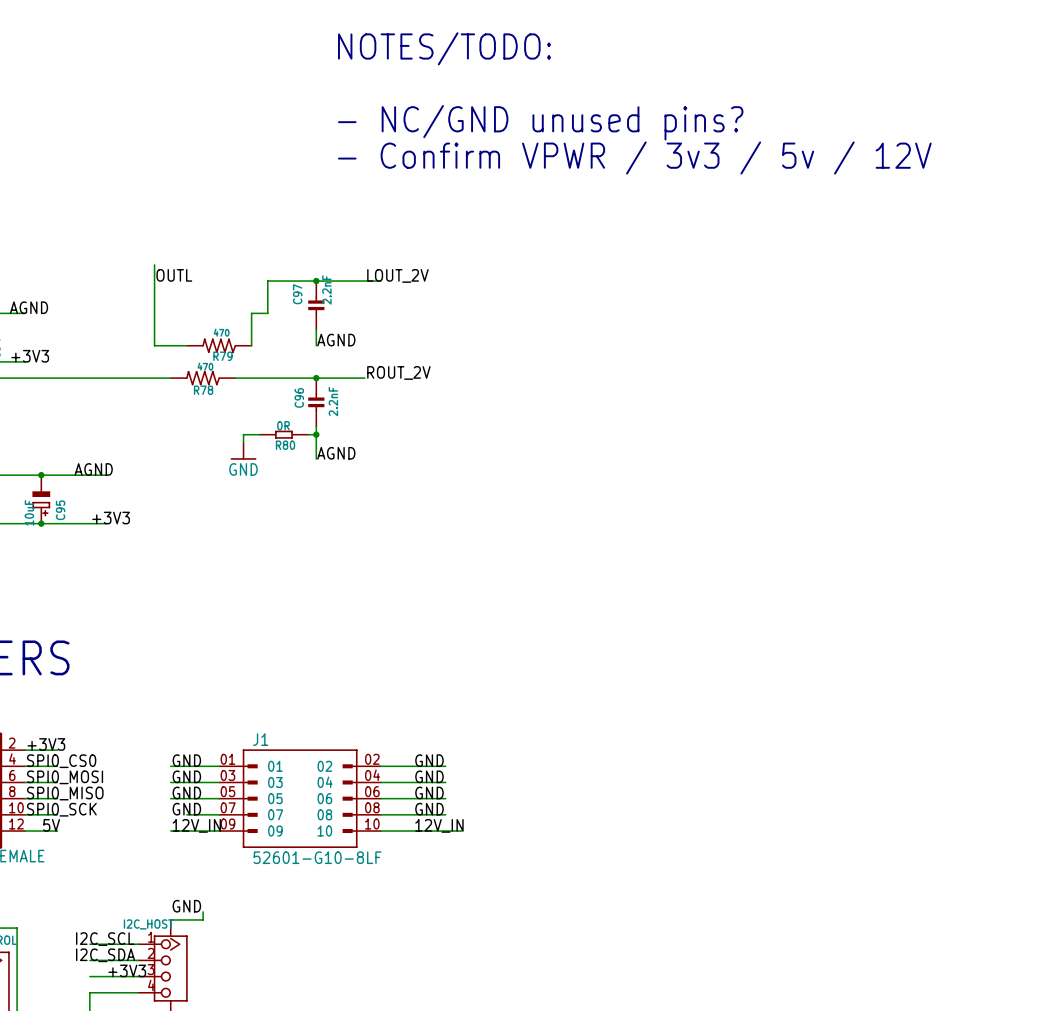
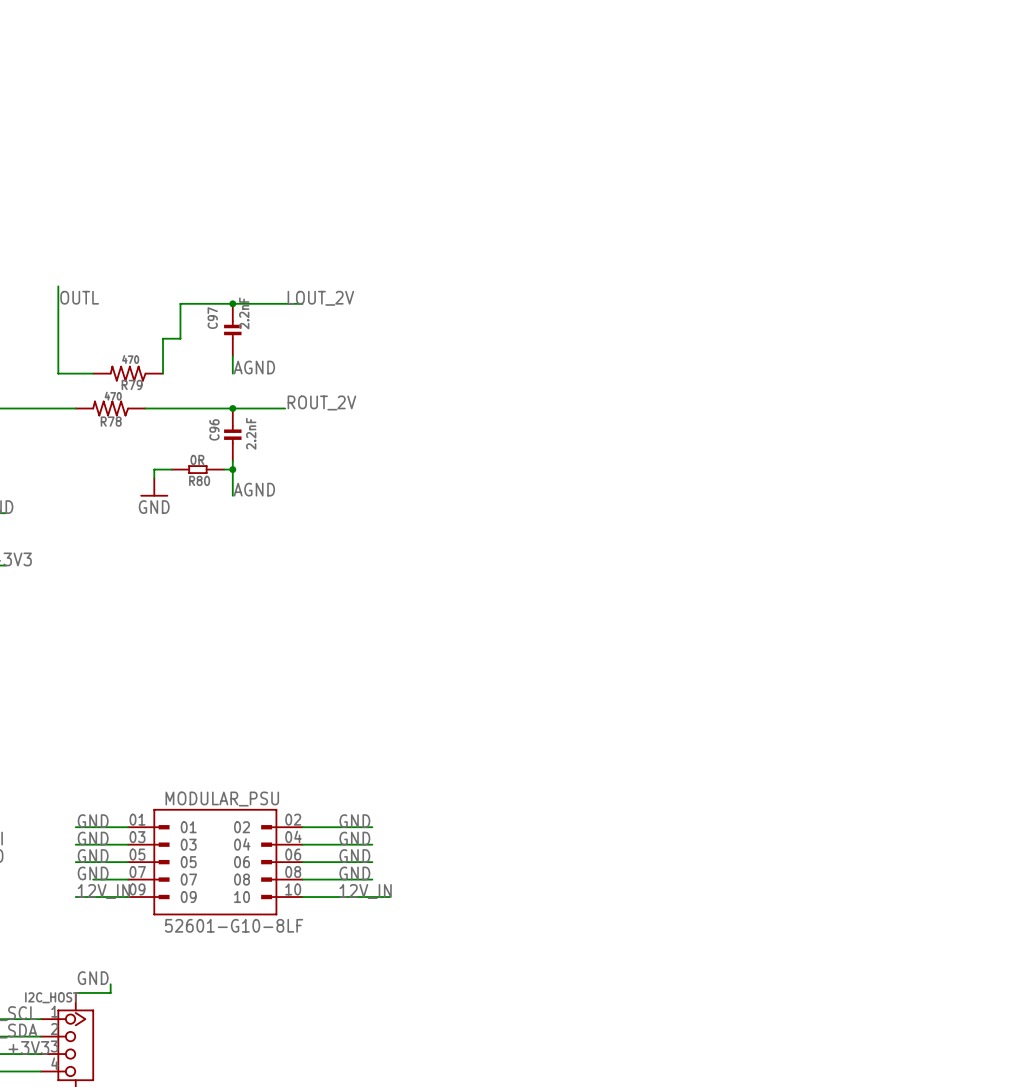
text: NOTES/TODO: (444, 48) -> none
text: - NC/GND unused pins? (540, 122) -> none
text: - Confirm VPWR / 3v3 / 5v / 12V (634, 157) -> none
J1 name: J1 (260, 739) -> MODULAR_PSU (222, 799)

